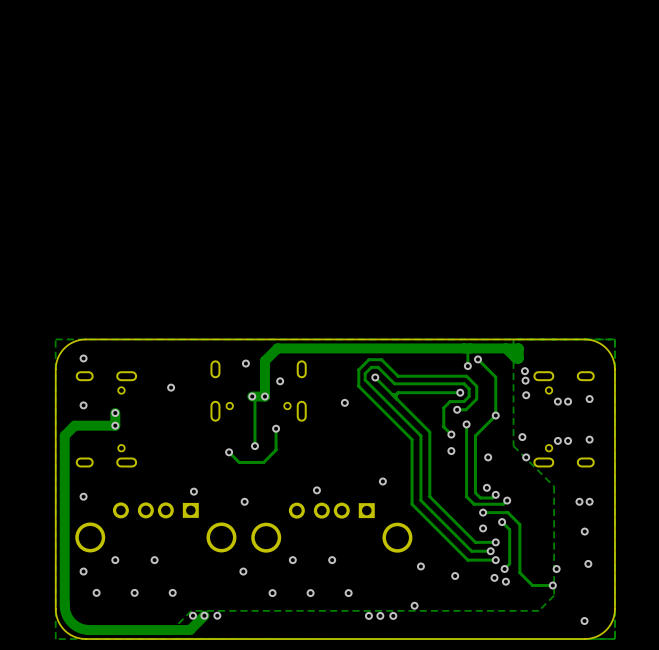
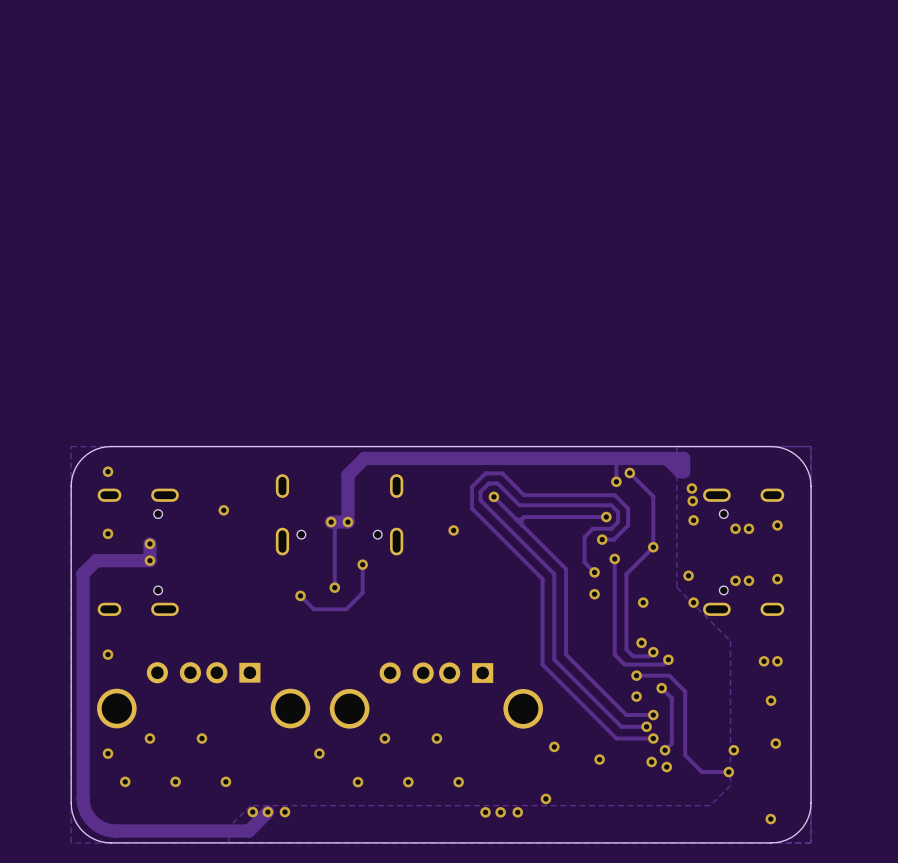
via: (245, 363) -> none
via: (280, 381) -> none
via: (382, 481) -> none
via: (316, 490) -> none
via: (193, 491) -> none
via: (244, 501) -> none

